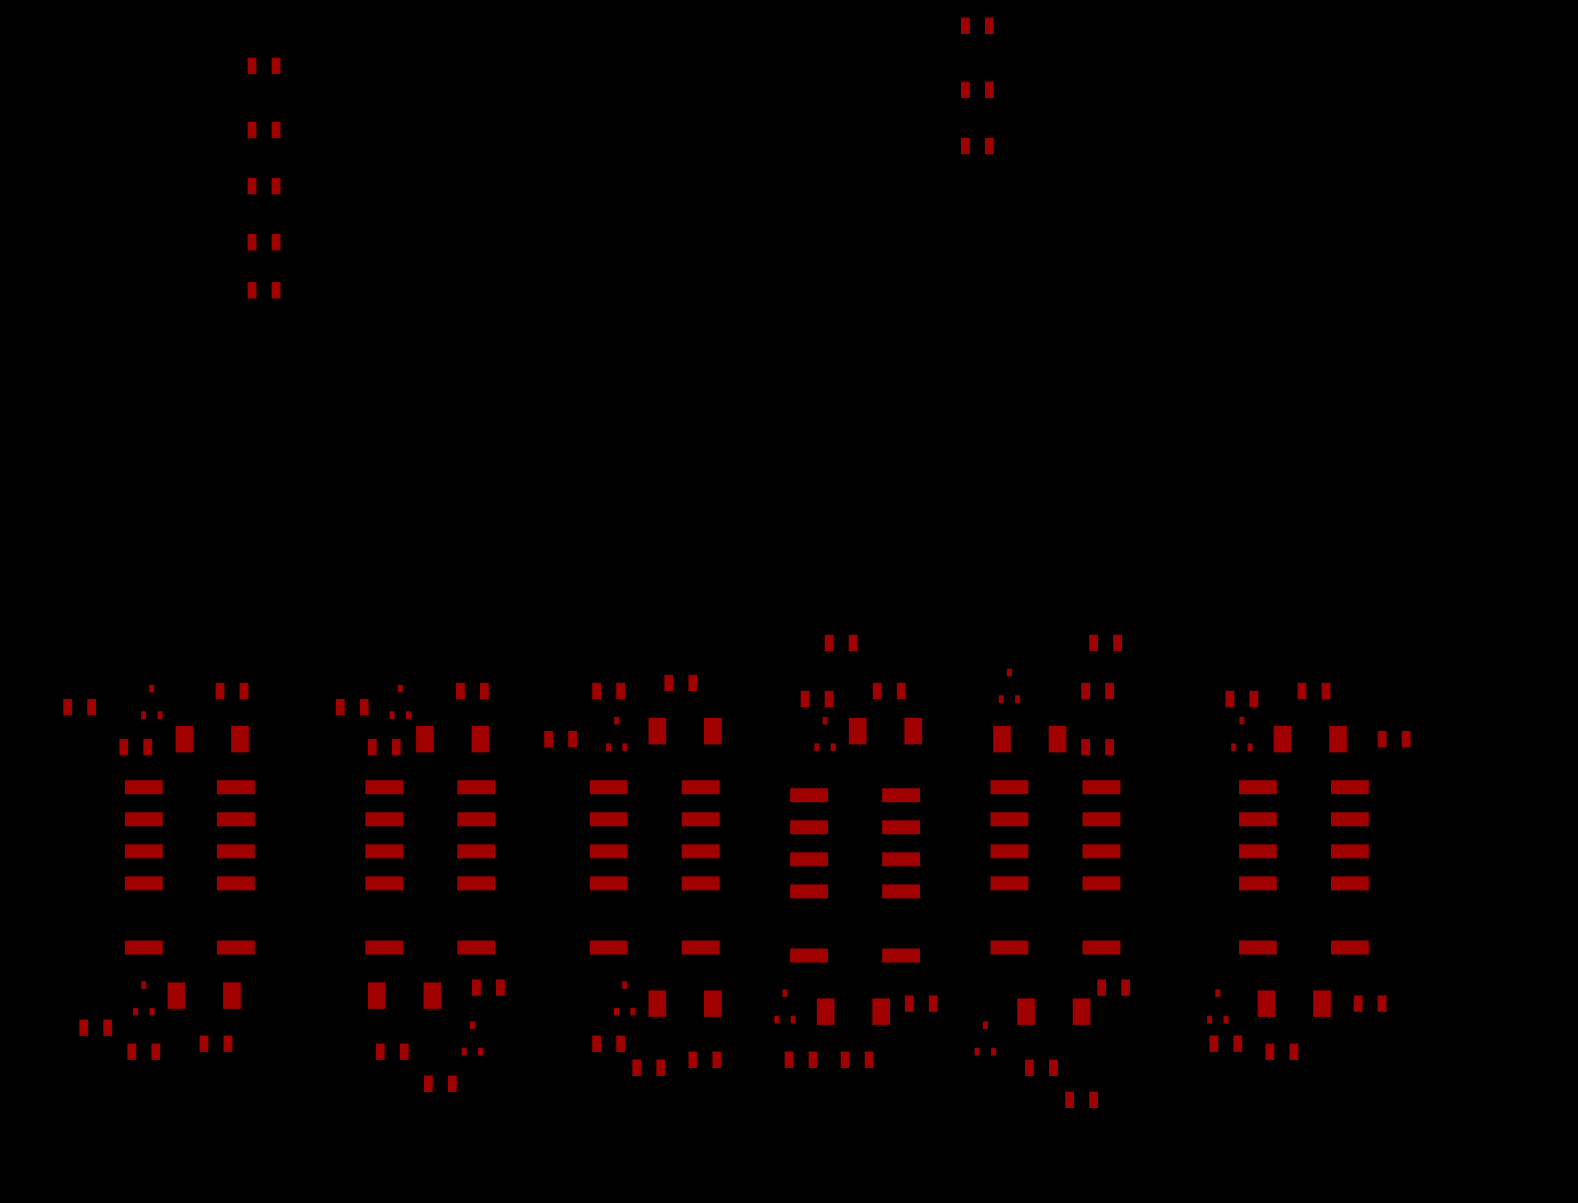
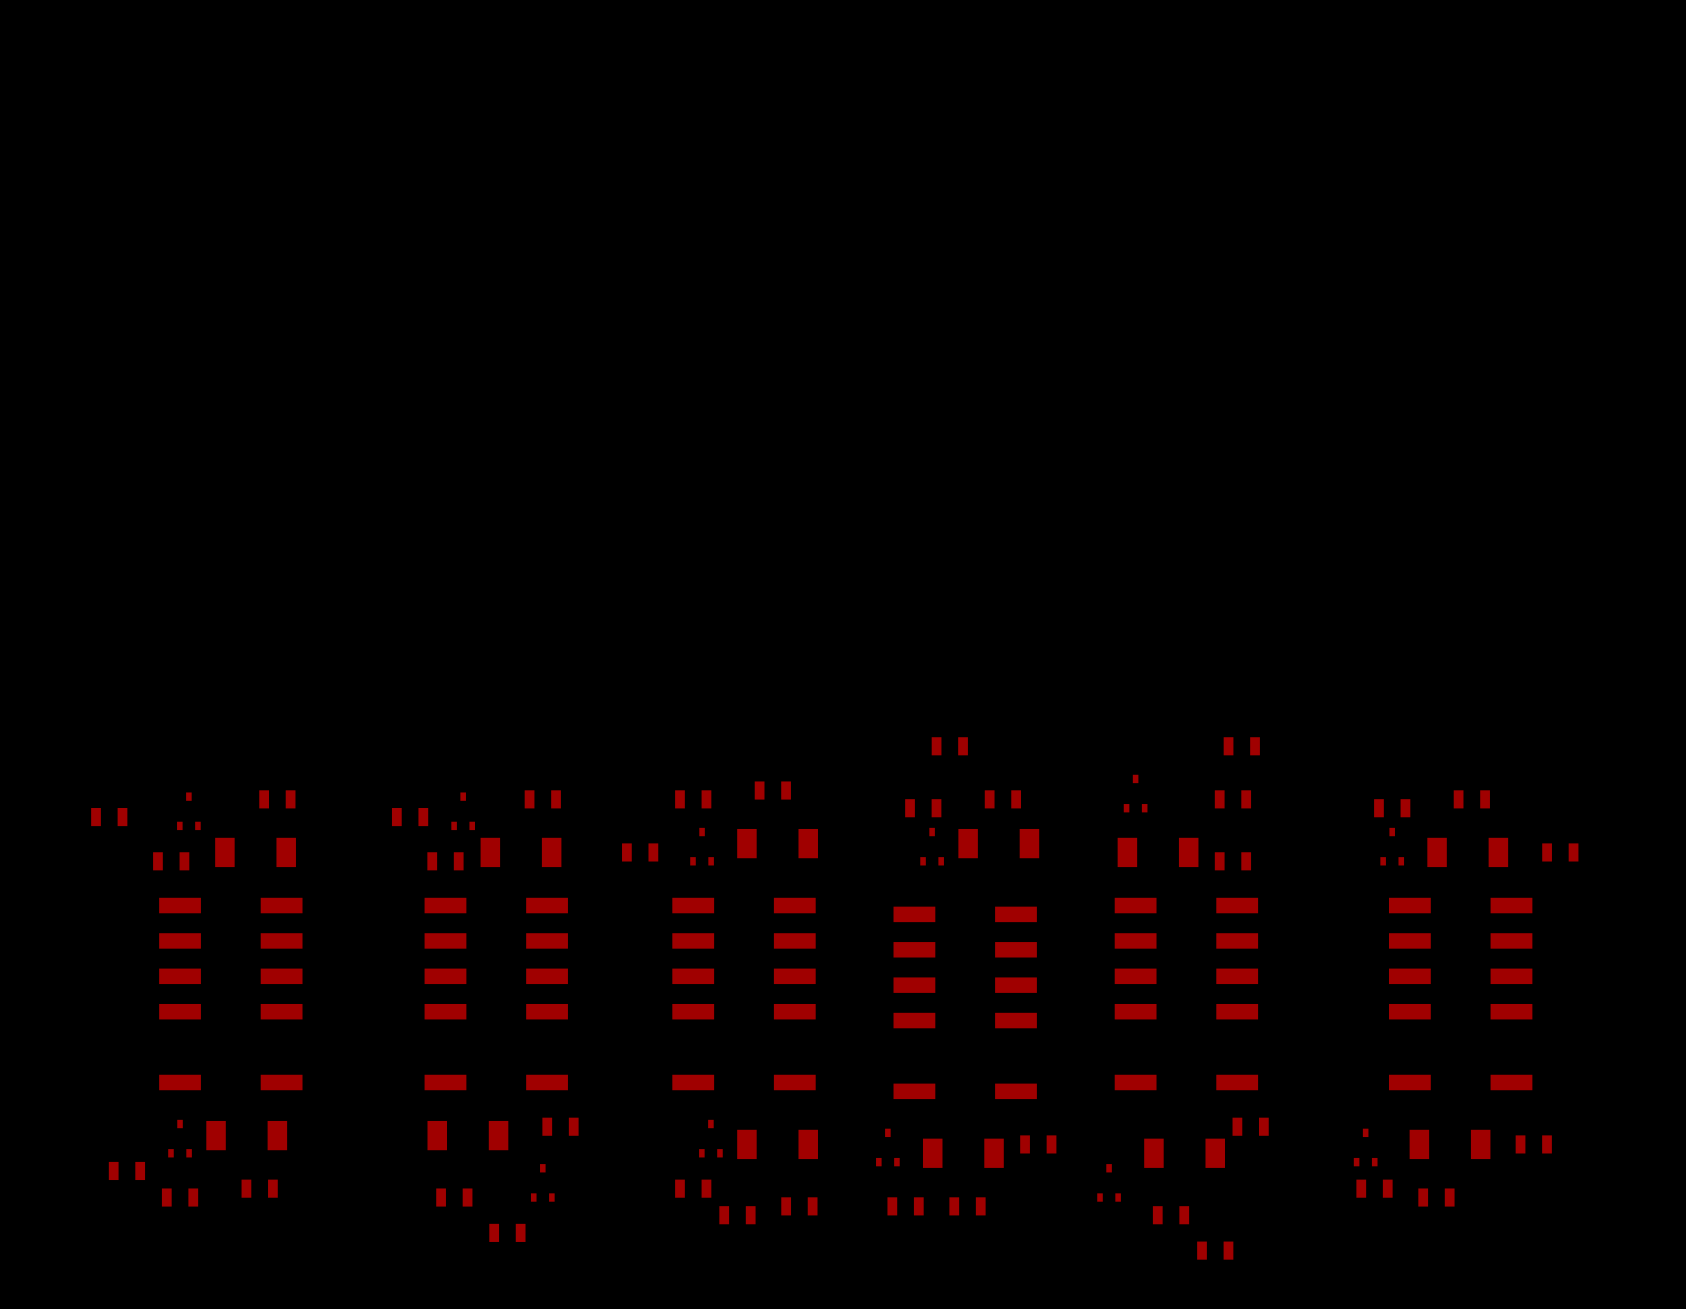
part: (977, 25) -> none
part: (264, 65) -> none
part: (977, 89) -> none
part: (264, 129) -> none
part: (977, 146) -> none
part: (264, 186) -> none
part: (264, 242) -> none
part: (264, 290) -> none

